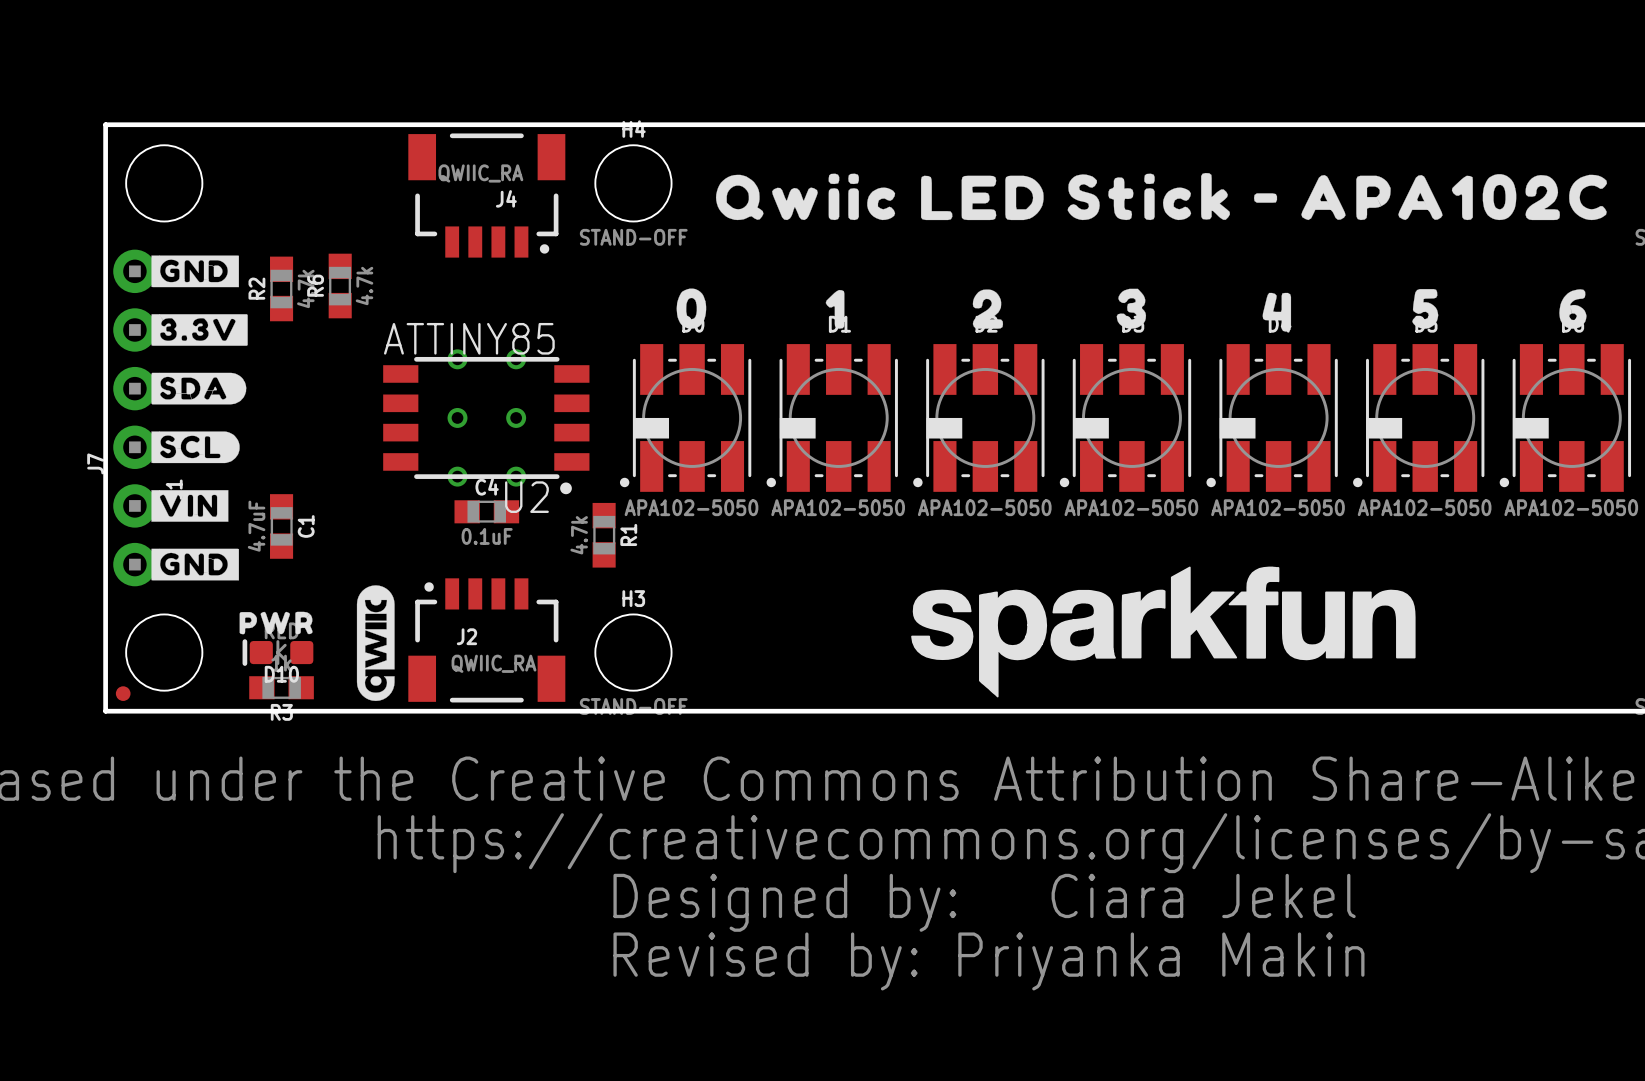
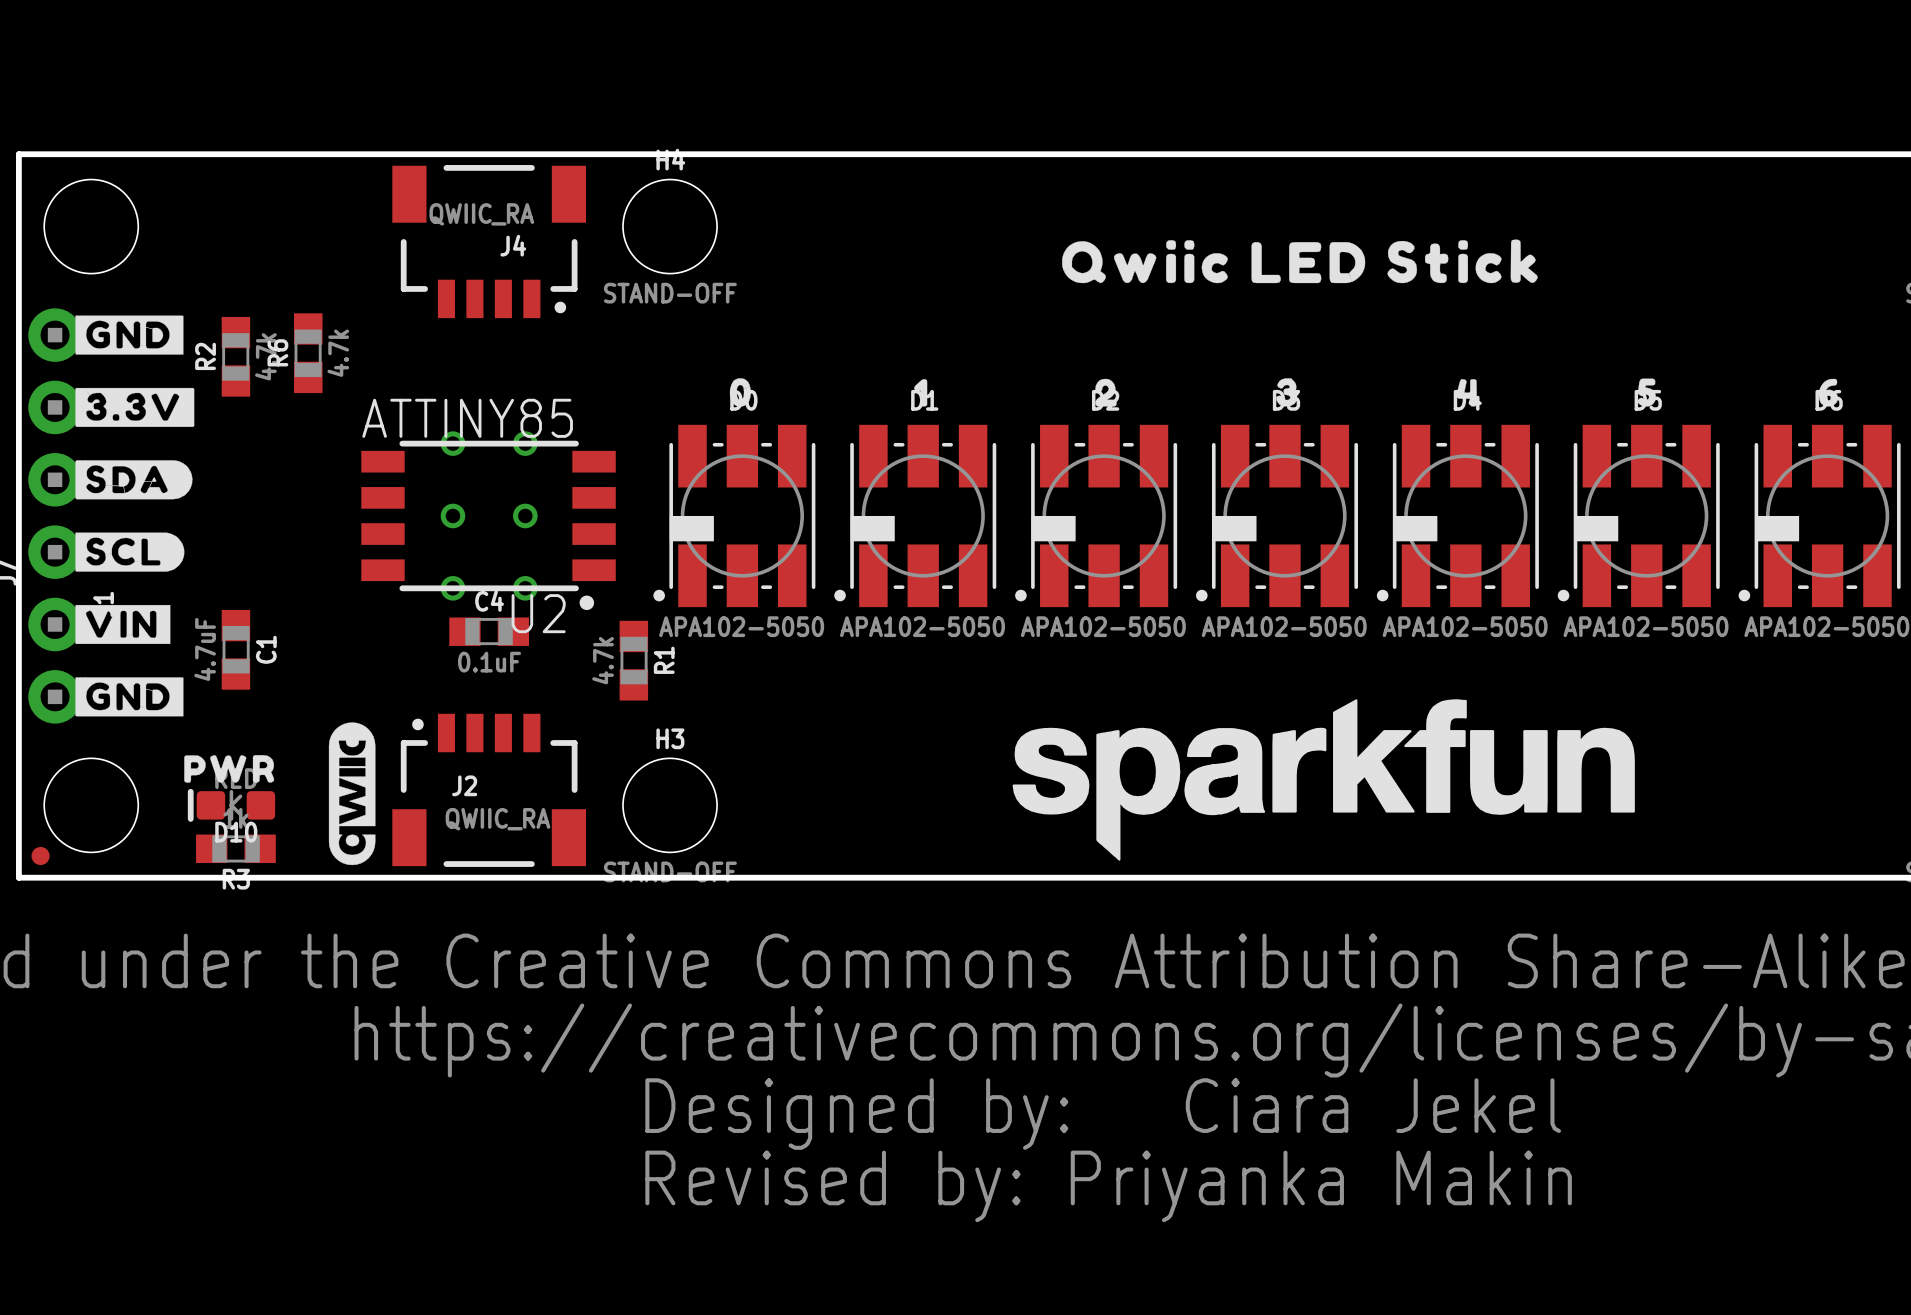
drawing shape: [715, 172, 1608, 221] -> [1062, 239, 1538, 284]
drawing shape: [676, 288, 707, 329] -> [729, 378, 751, 407]
drawing shape: [1116, 288, 1147, 329] -> [1276, 378, 1298, 407]
drawing shape: [825, 289, 845, 329] -> [914, 379, 928, 407]
drawing shape: [972, 289, 1004, 329] -> [1095, 378, 1117, 407]
drawing shape: [1412, 289, 1439, 329] -> [1637, 378, 1656, 407]
drawing shape: [1559, 289, 1587, 329] -> [1818, 378, 1838, 407]
drawing shape: [1262, 292, 1292, 332] -> [1456, 379, 1477, 407]

